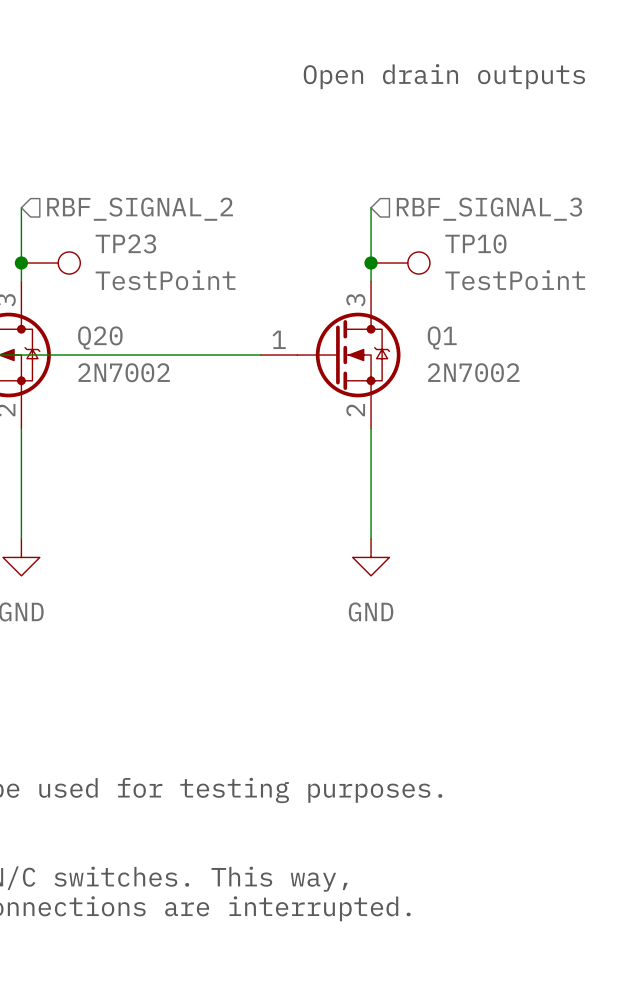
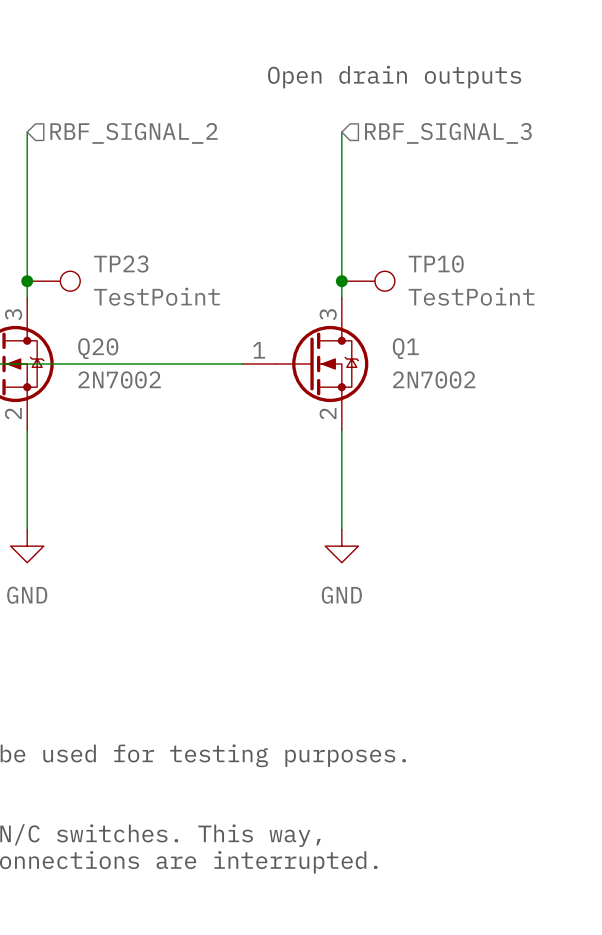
text position: Open drain outputs (444, 76) -> Open drain outputs (394, 77)
wire: none -> (27, 132) (27, 231)
wire: none -> (341, 132) (341, 231)
hierarchical label position: RBF_SIGNAL_2 (140, 209) -> RBF_SIGNAL_2 (133, 133)
hierarchical label position: RBF_SIGNAL_3 (489, 209) -> RBF_SIGNAL_3 (448, 133)

